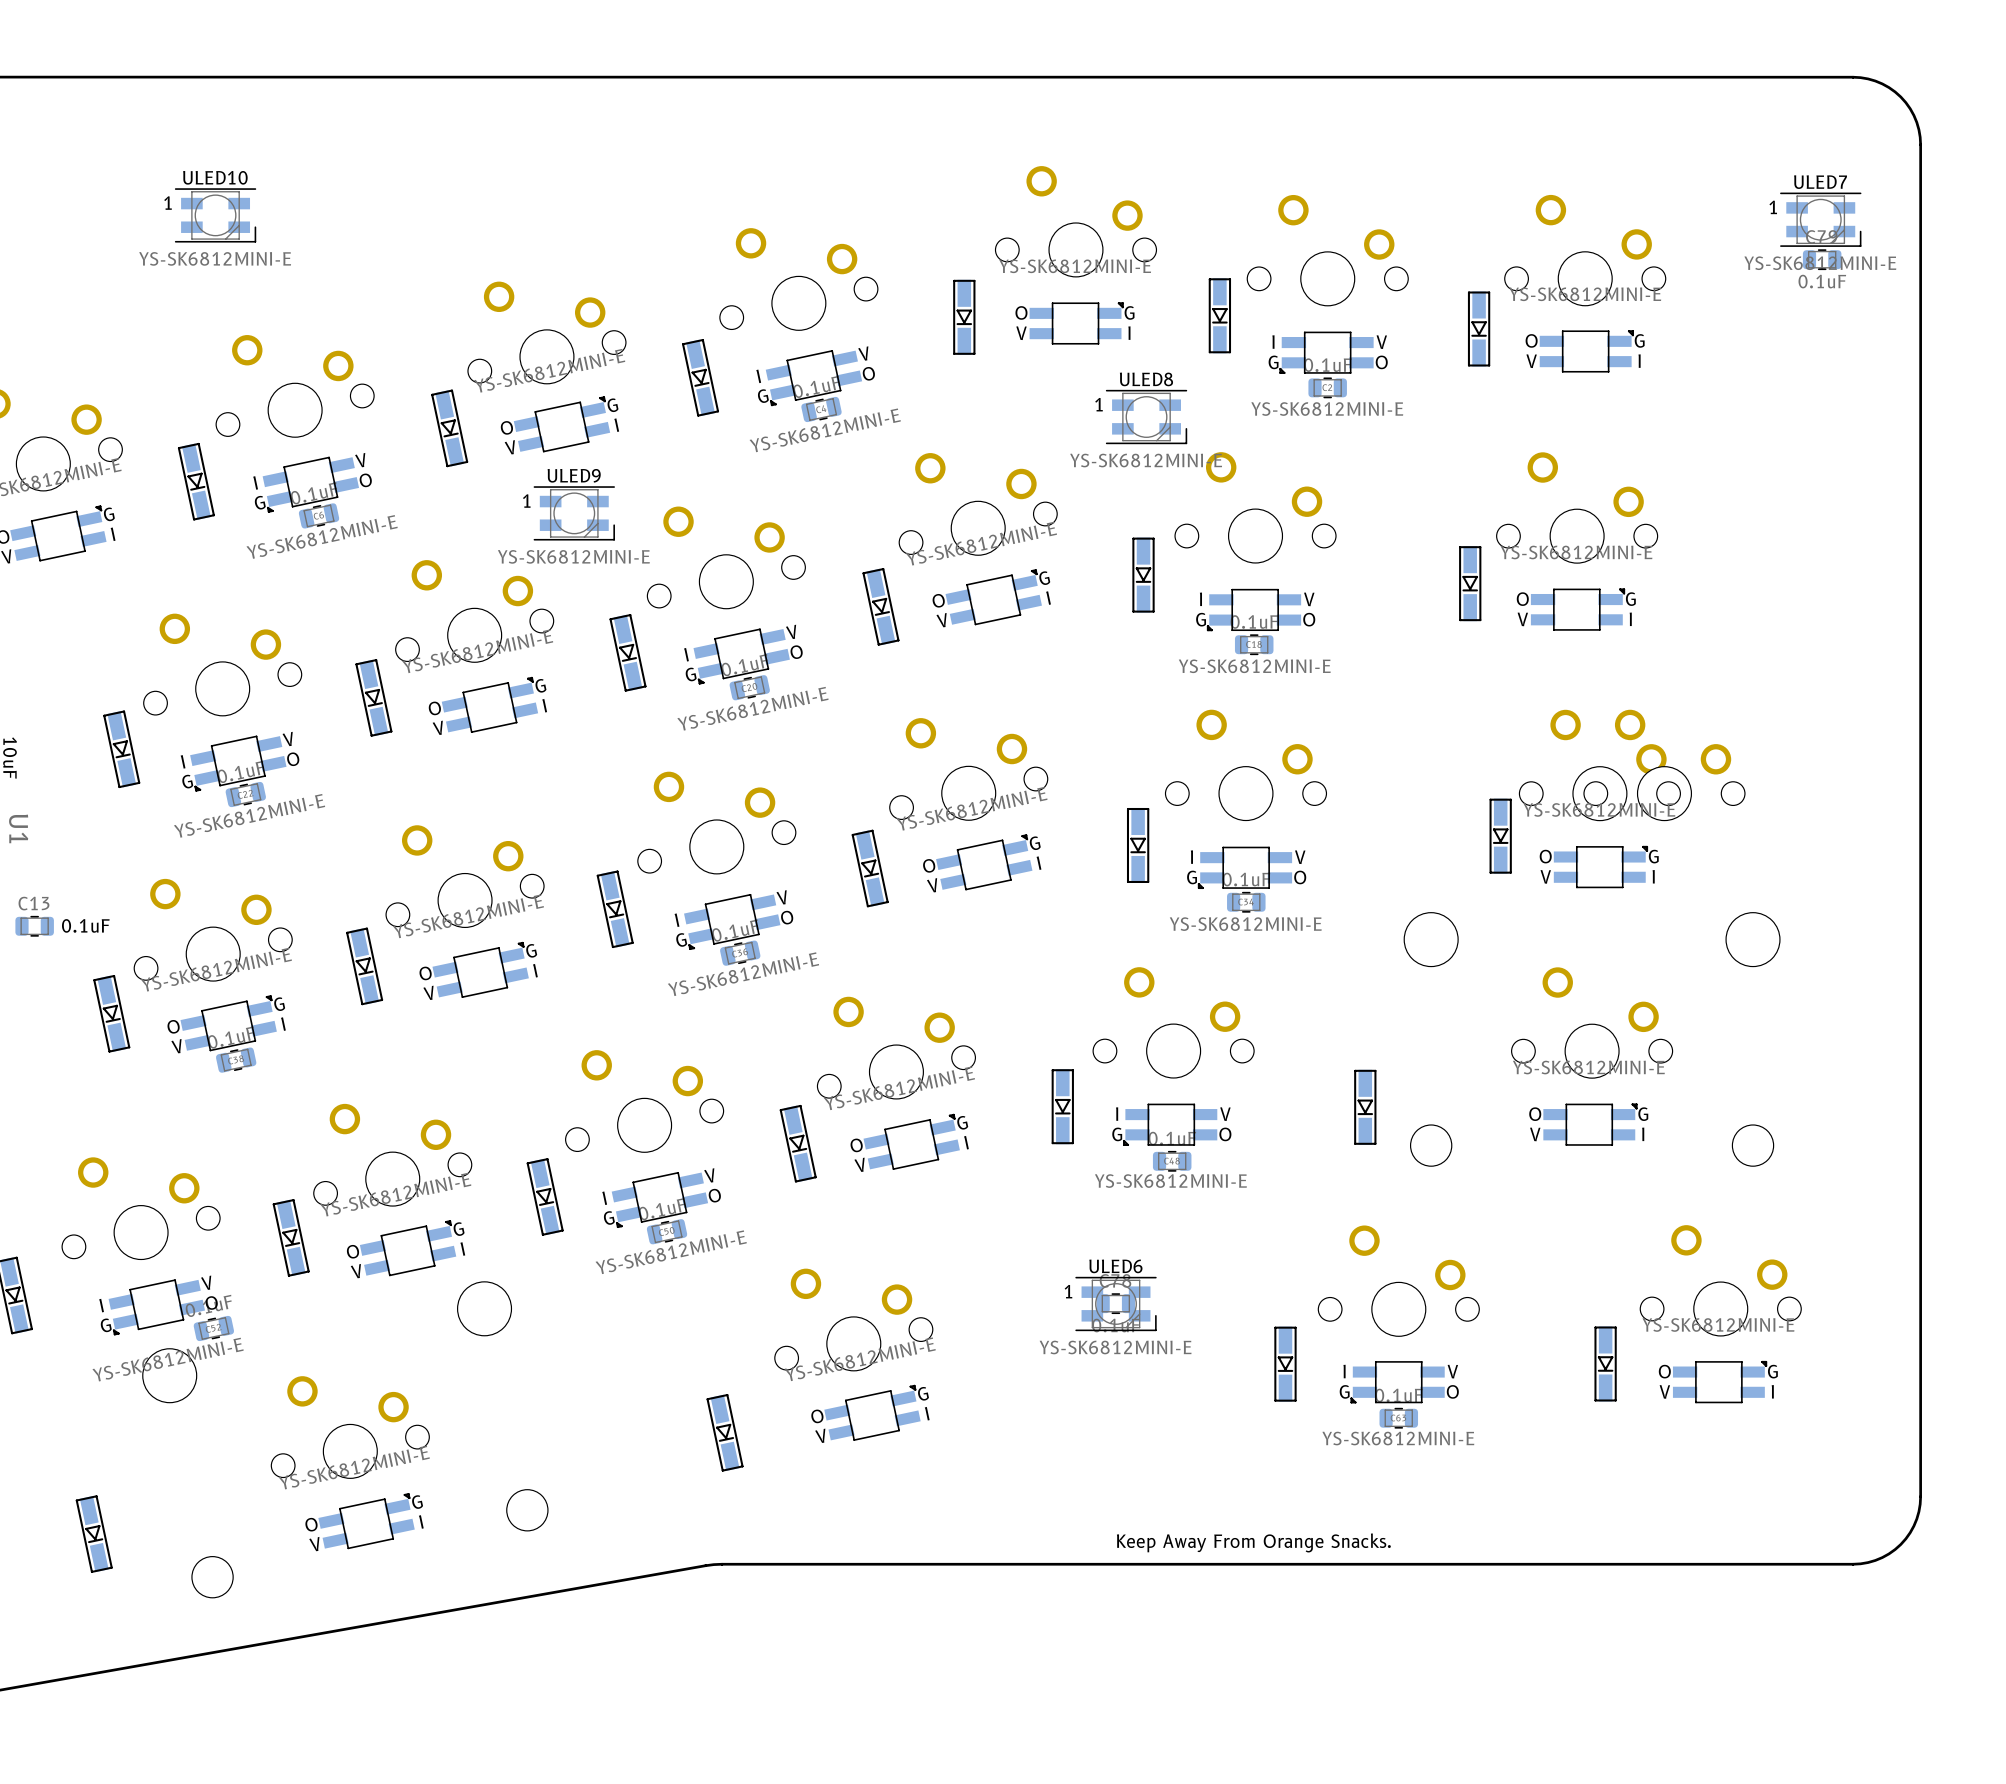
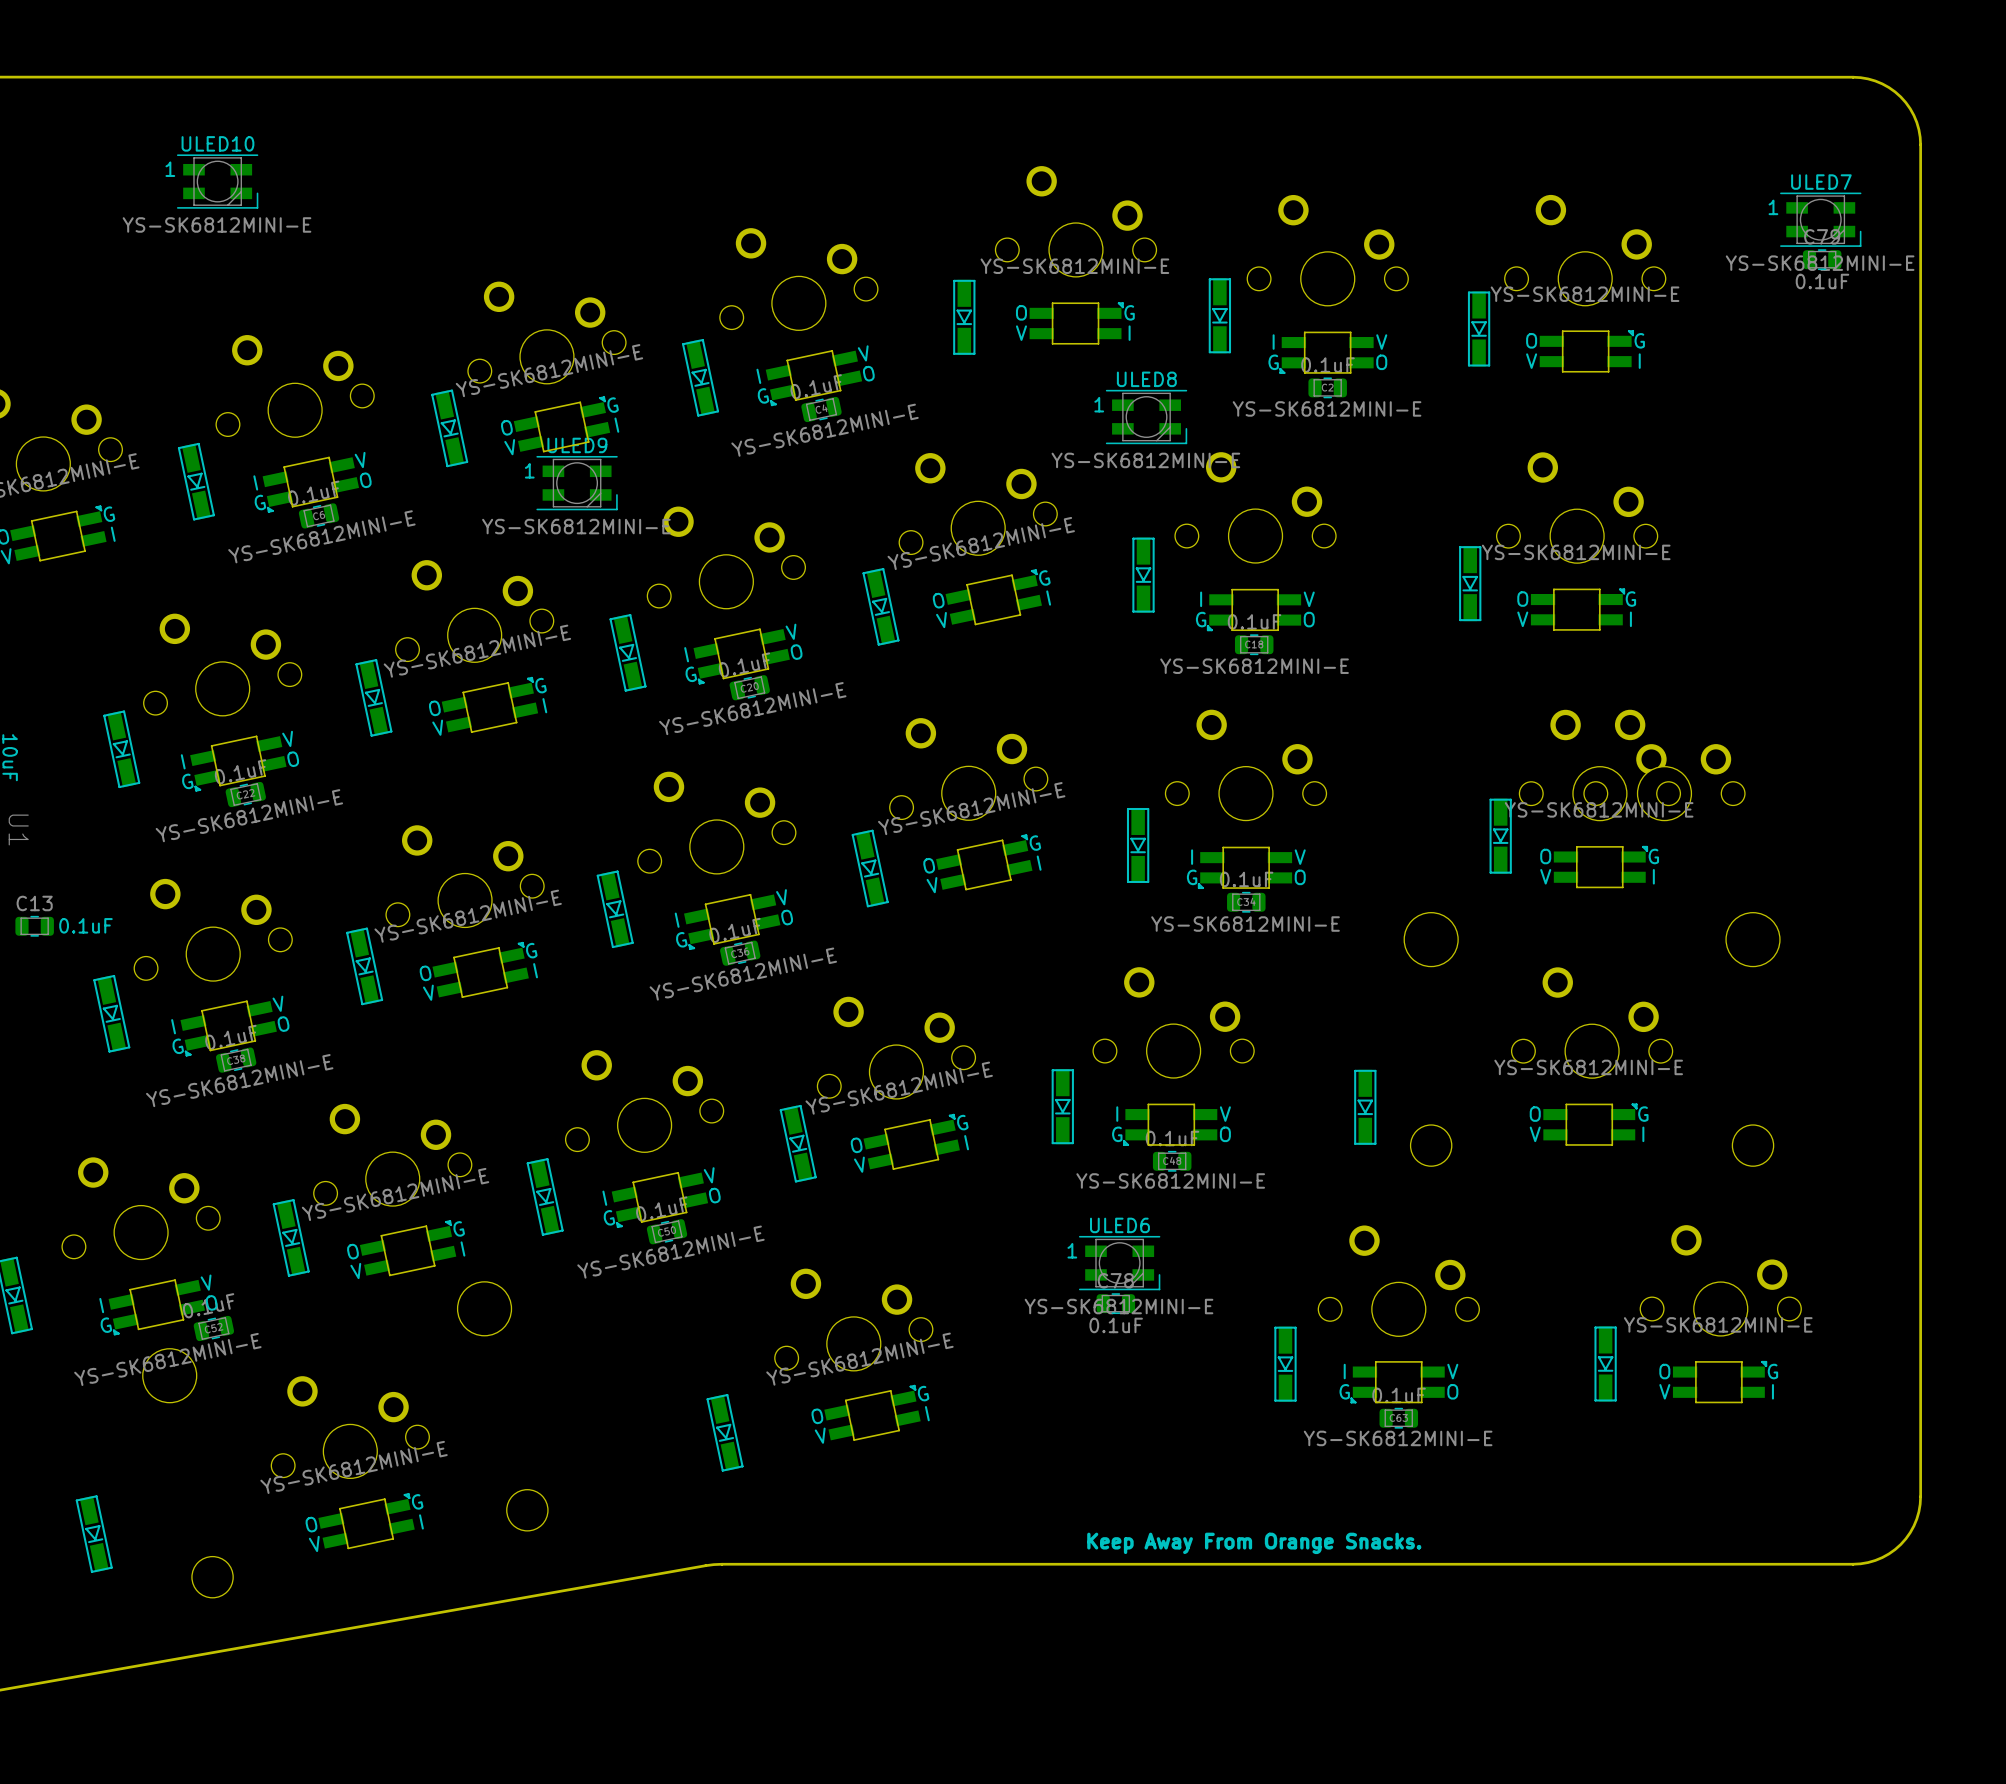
ULED10 position: (215, 215) -> (217, 181)
ULED9 position: (574, 513) -> (577, 483)
part rotation: 0° (228, 1023) -> 180° (228, 1028)
ULED6 position: (1116, 1303) -> (1119, 1263)

